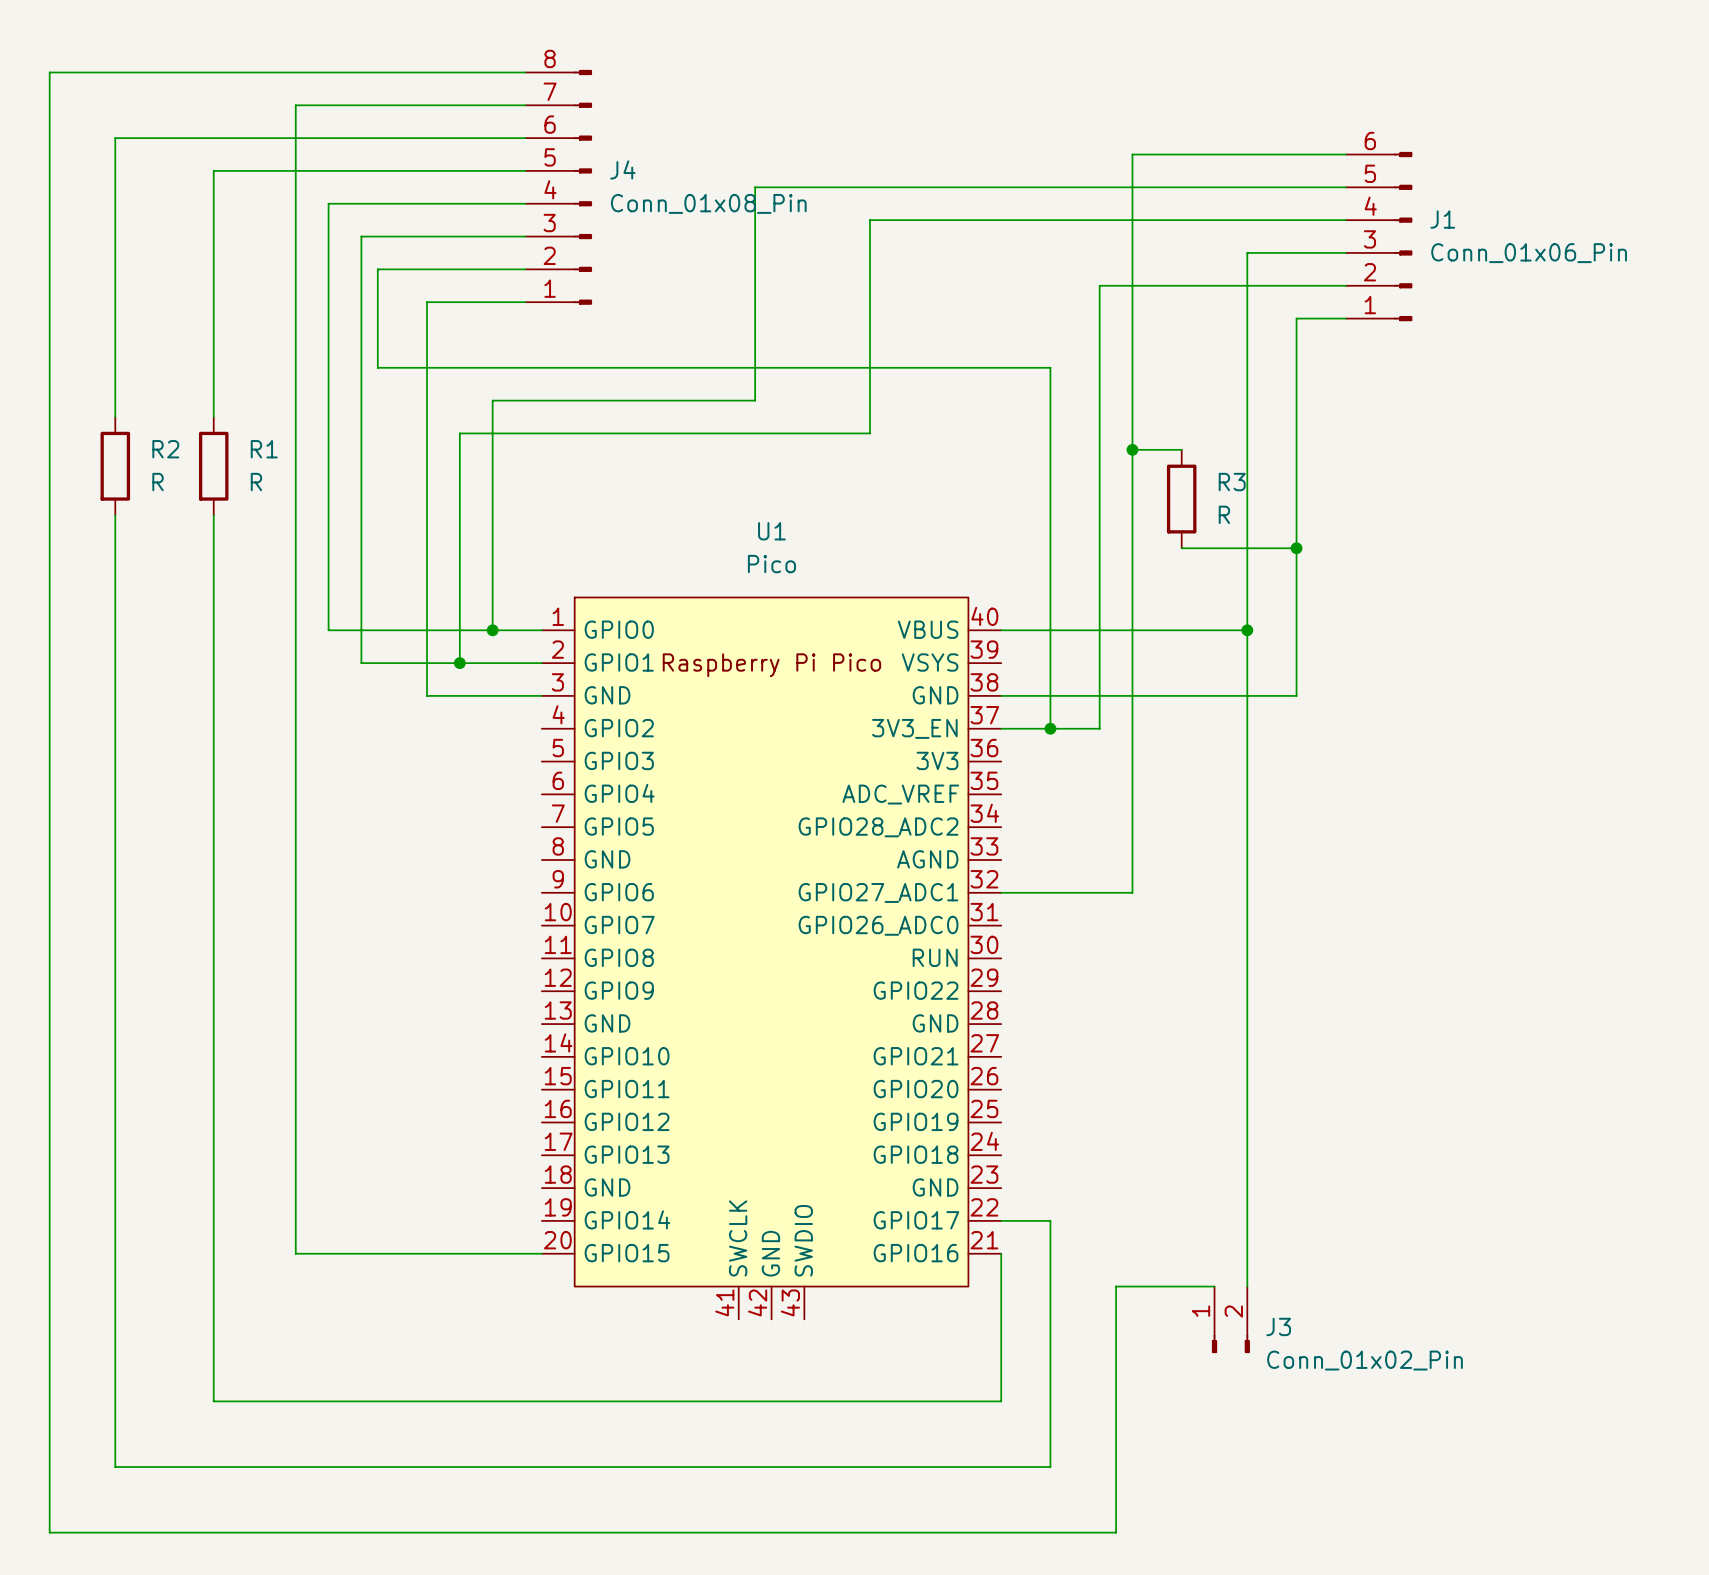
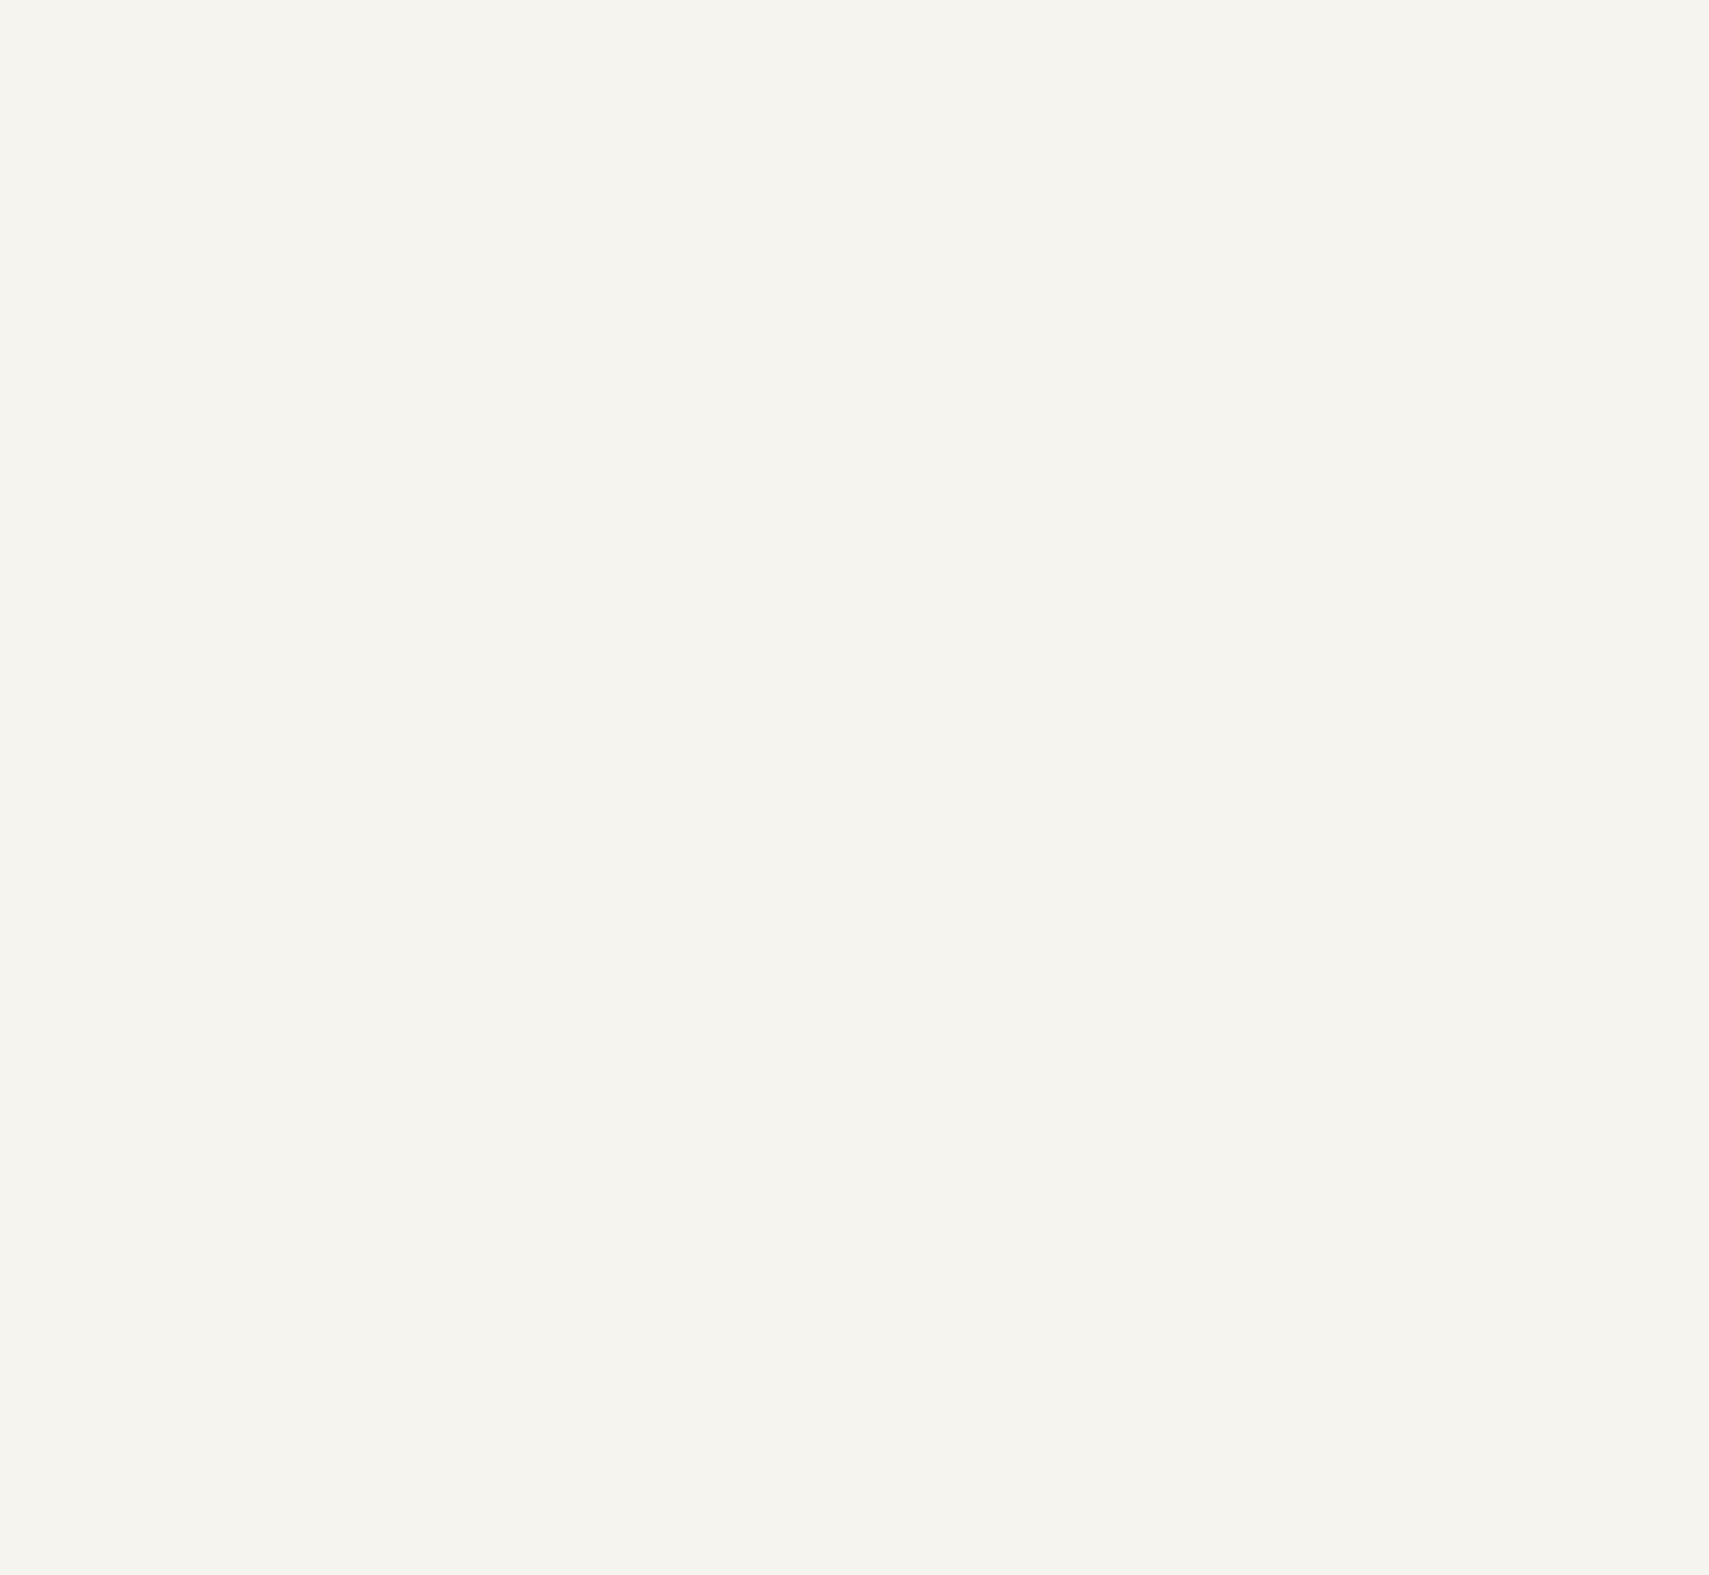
wire: (525, 72) (49, 72) (49, 1532) (1116, 1532) (1116, 1286) (1214, 1286) -> none
wire: (525, 105) (295, 105) (295, 1253) (541, 1253) -> none
wire: (525, 138) (115, 138) (115, 417) -> none
wire: (1345, 154) (1132, 154) (1132, 892) (1001, 892) -> none
wire: (525, 170) (213, 170) (213, 417) -> none
J4: Conn_01x08_Pin (558, 187) -> none
wire: (1345, 187) (755, 187) (755, 400) (492, 400) (492, 630) -> none
wire: (525, 203) (328, 203) (328, 630) (541, 630) -> none
wire: (1345, 220) (869, 220) (869, 433) (459, 433) (459, 663) -> none
wire: (525, 236) (361, 236) (361, 663) (541, 663) -> none
J1: Conn_01x06_Pin (1379, 236) -> none
wire: (1345, 252) (1247, 252) (1247, 1286) -> none
wire: (525, 269) (377, 269) (377, 367) (1050, 367) (1050, 728) -> none
wire: (1345, 285) (1099, 285) (1099, 728) (1001, 728) -> none
wire: (525, 302) (427, 302) (427, 695) (541, 695) -> none
wire: (1345, 318) (1296, 318) (1296, 695) (1001, 695) -> none
wire: (1132, 449) (1181, 449) -> none
junction: (1132, 449) -> none
R2: R (115, 466) -> none
R1: R (213, 466) -> none
R3: R (1181, 499) -> none
wire: (115, 515) (115, 1467) (1050, 1467) (1050, 1220) (1001, 1220) -> none
wire: (213, 515) (213, 1401) (1001, 1401) (1001, 1253) -> none
wire: (1181, 548) (1296, 548) -> none
junction: (1296, 548) -> none
junction: (492, 630) -> none
wire: (1001, 630) (1247, 630) -> none
junction: (1247, 630) -> none
junction: (459, 663) -> none
junction: (1050, 728) -> none
U1: Pico (771, 958) -> none
J3: Conn_01x02_Pin (1230, 1319) -> none

